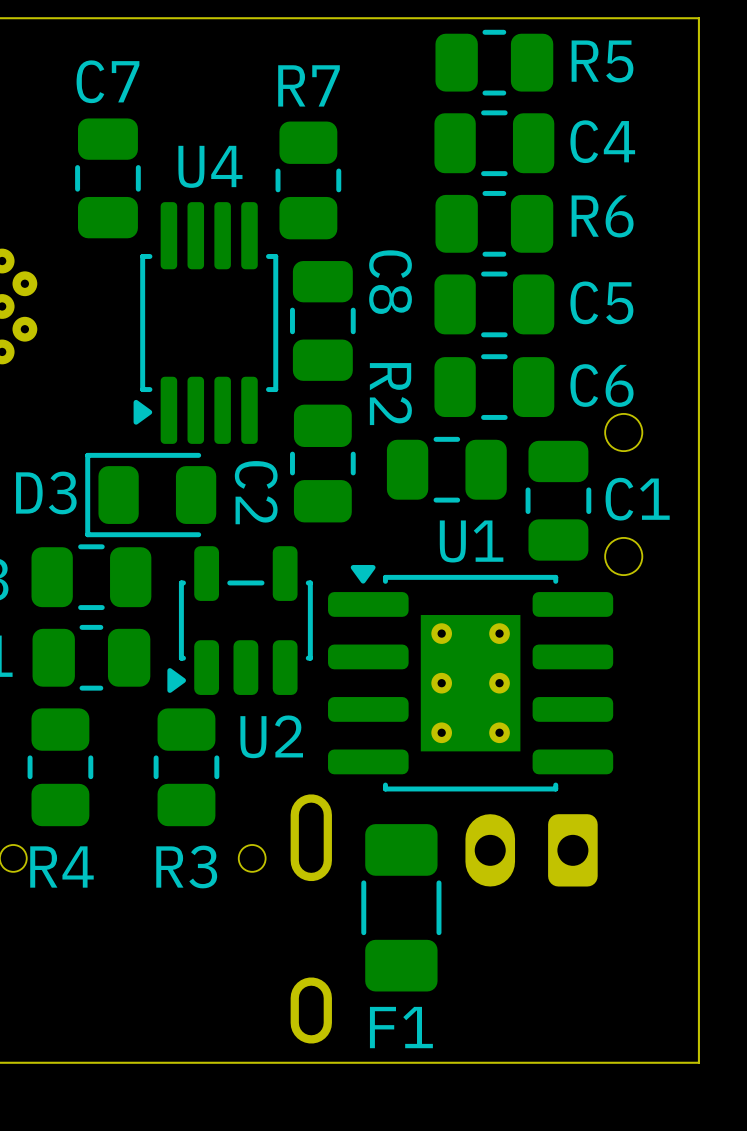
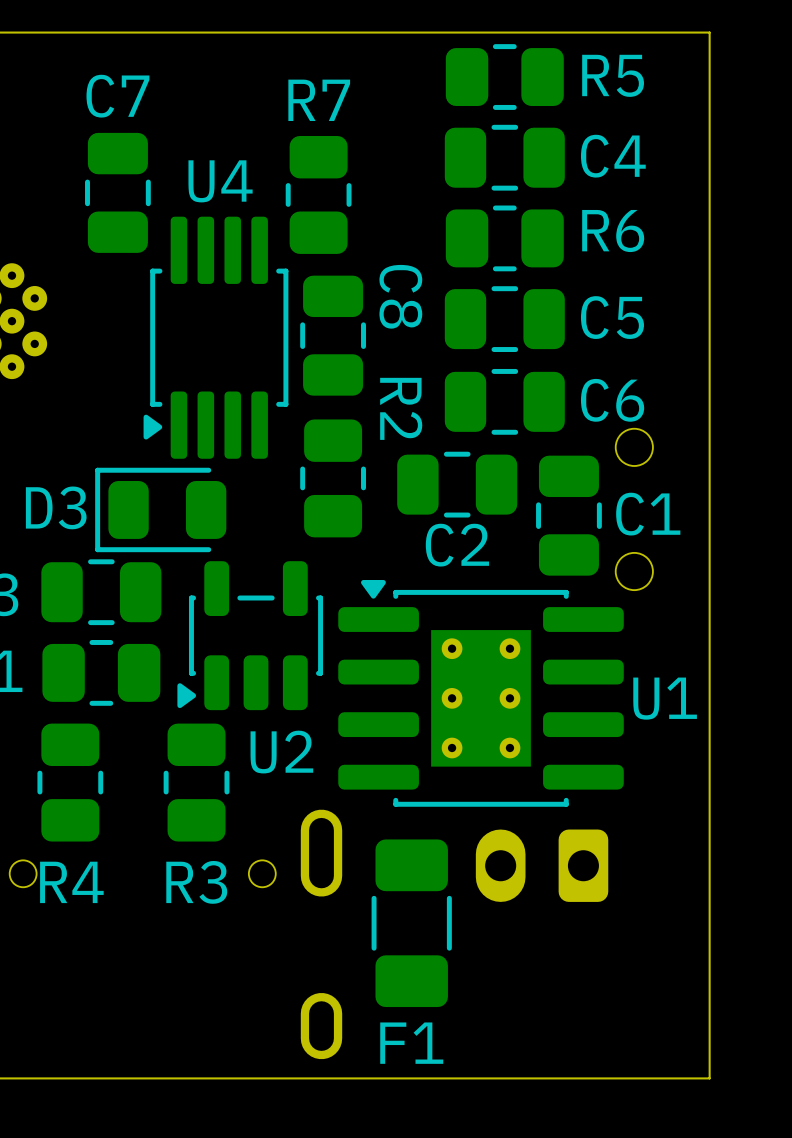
C2 name rotation: 0° (256, 492) -> 90° counterclockwise (457, 545)
C2 name position: C2 (256, 492) -> C2 (457, 545)
U1 name position: U1 (471, 541) -> U1 (665, 698)

